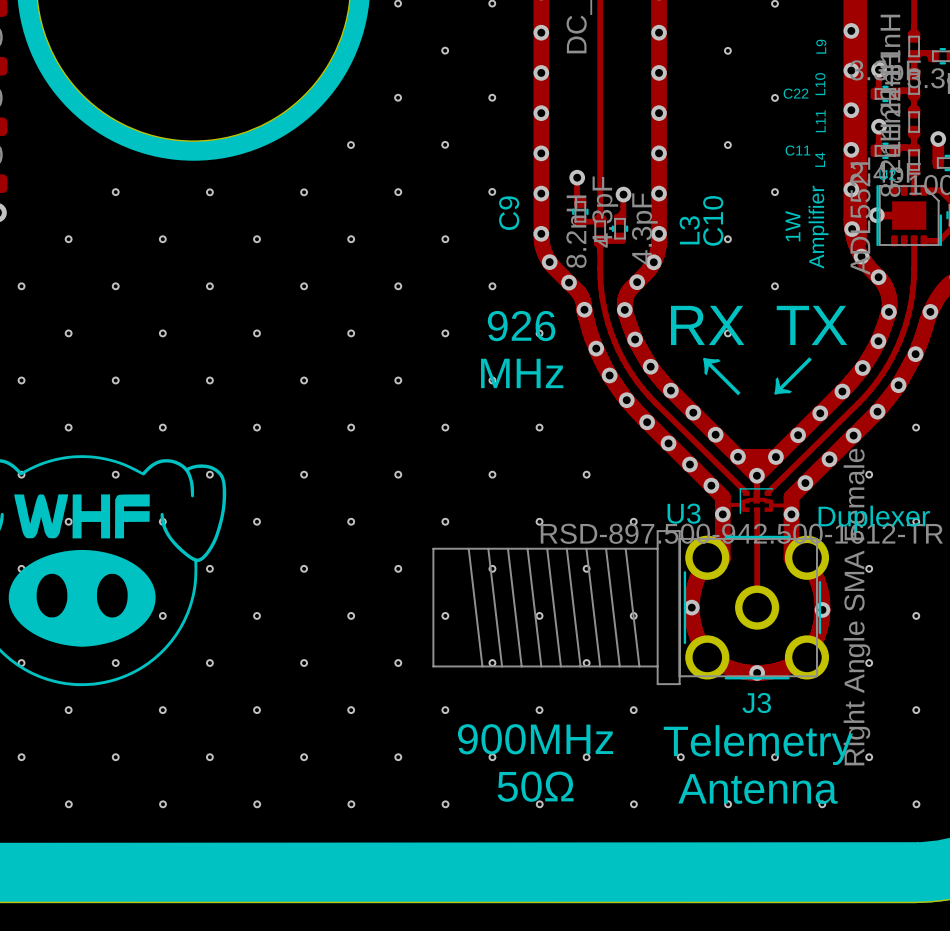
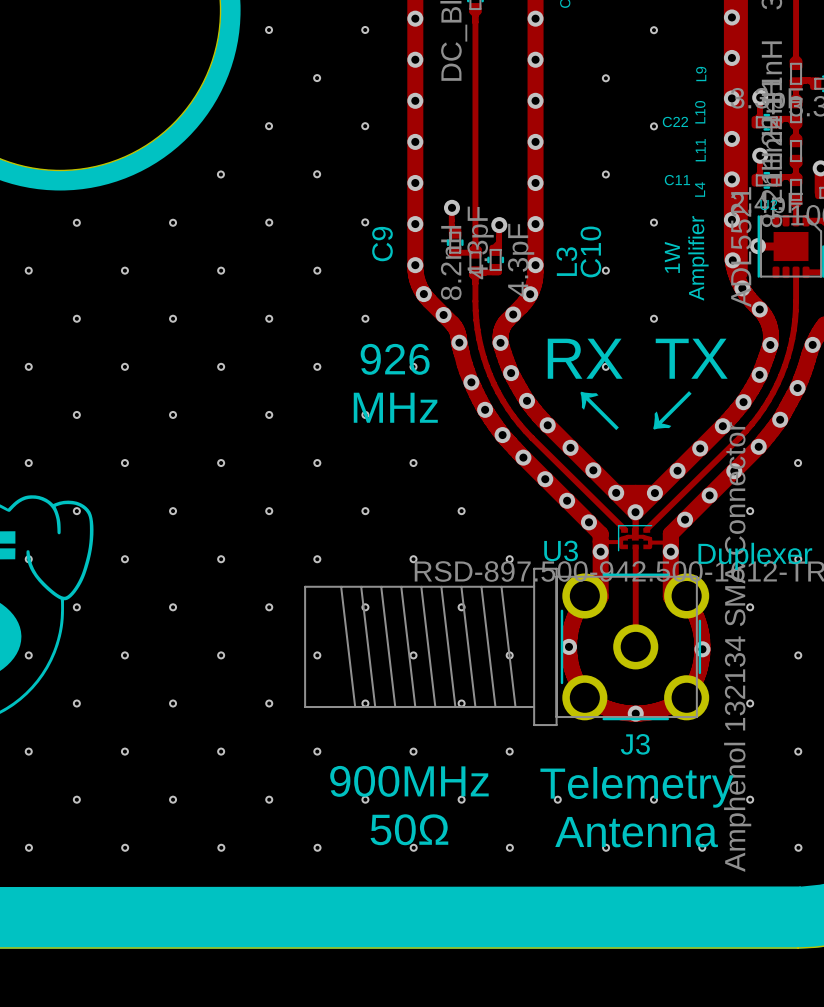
J3 value: Right Angle SMA Female (856, 607) -> Amphenol 132134 SMA Connector (737, 647)

